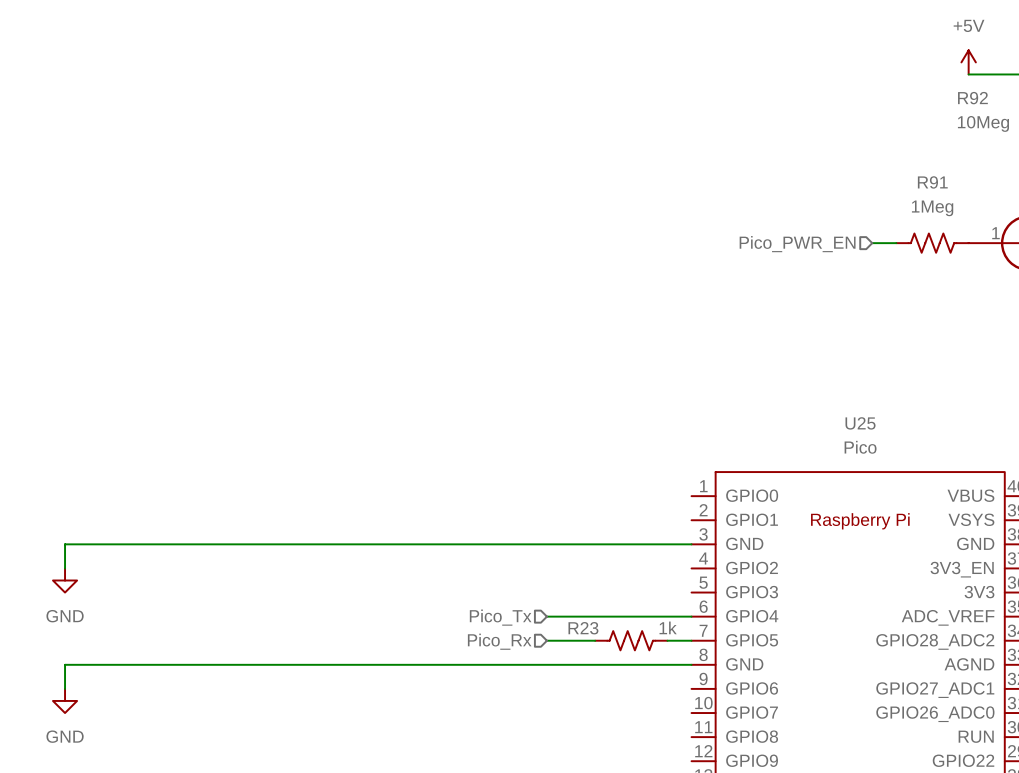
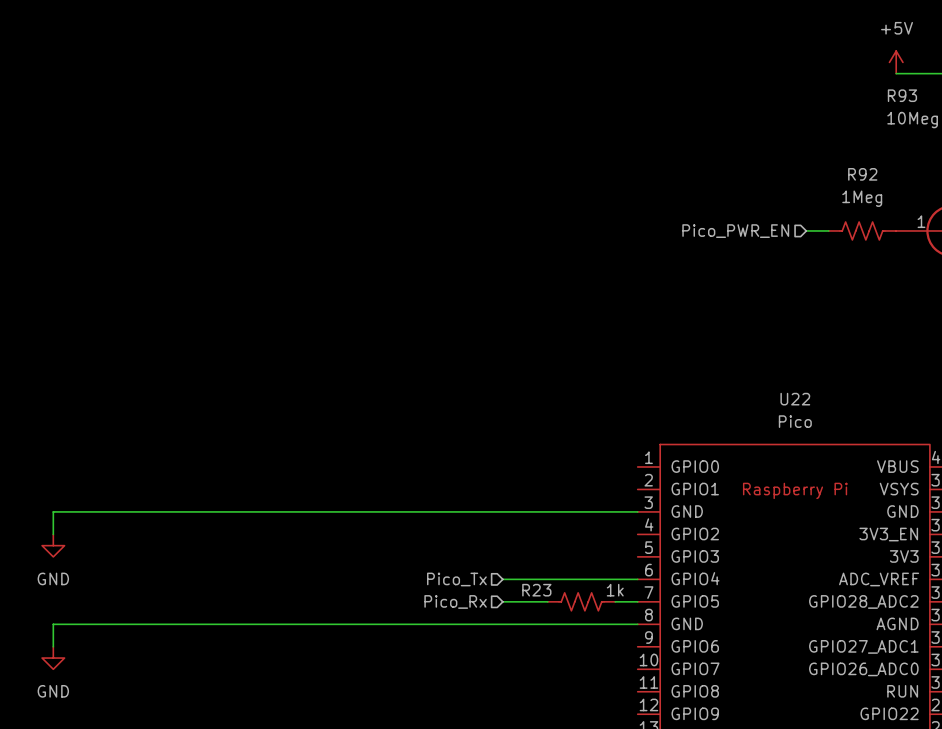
R92 name: R92 (972, 98) -> R93 (902, 95)
R91 name: R91 (932, 182) -> R92 (862, 174)
U25 name: U25 (860, 423) -> U22 (795, 399)

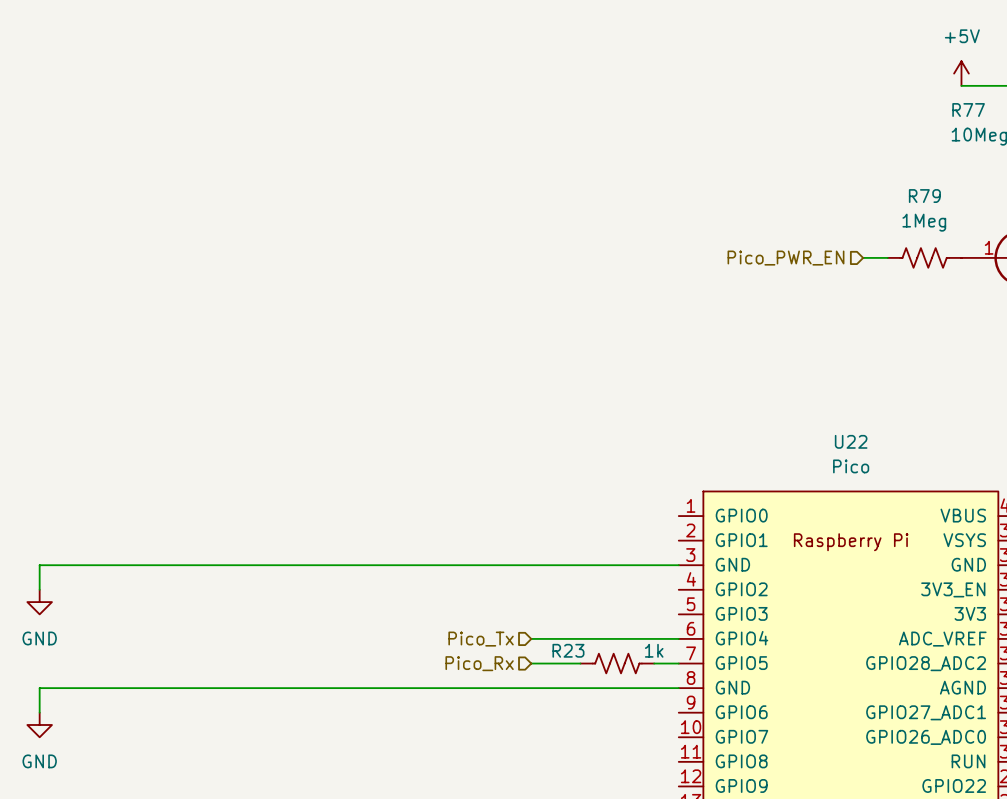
R93 name: R93 (902, 95) -> R77 (968, 109)
R92 name: R92 (862, 174) -> R79 (924, 196)

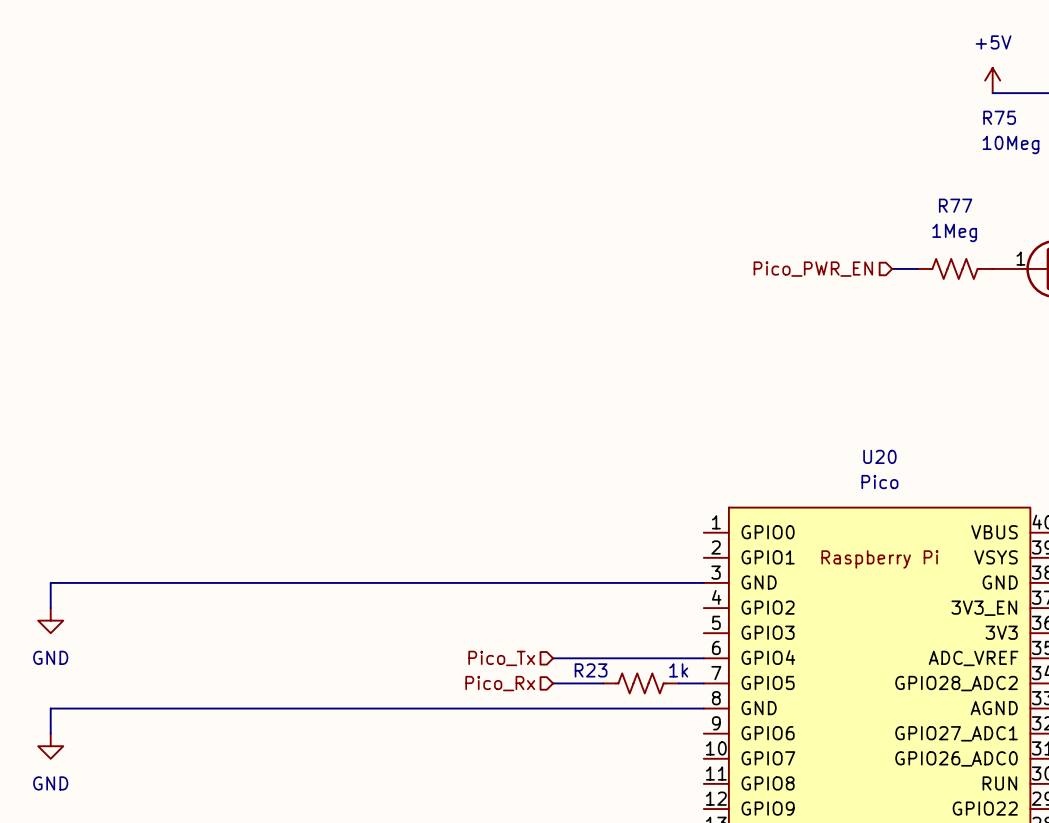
R77 name: R77 (968, 109) -> R75 (999, 117)
R79 name: R79 (924, 196) -> R77 (955, 205)
U22 name: U22 (851, 441) -> U20 (879, 456)

